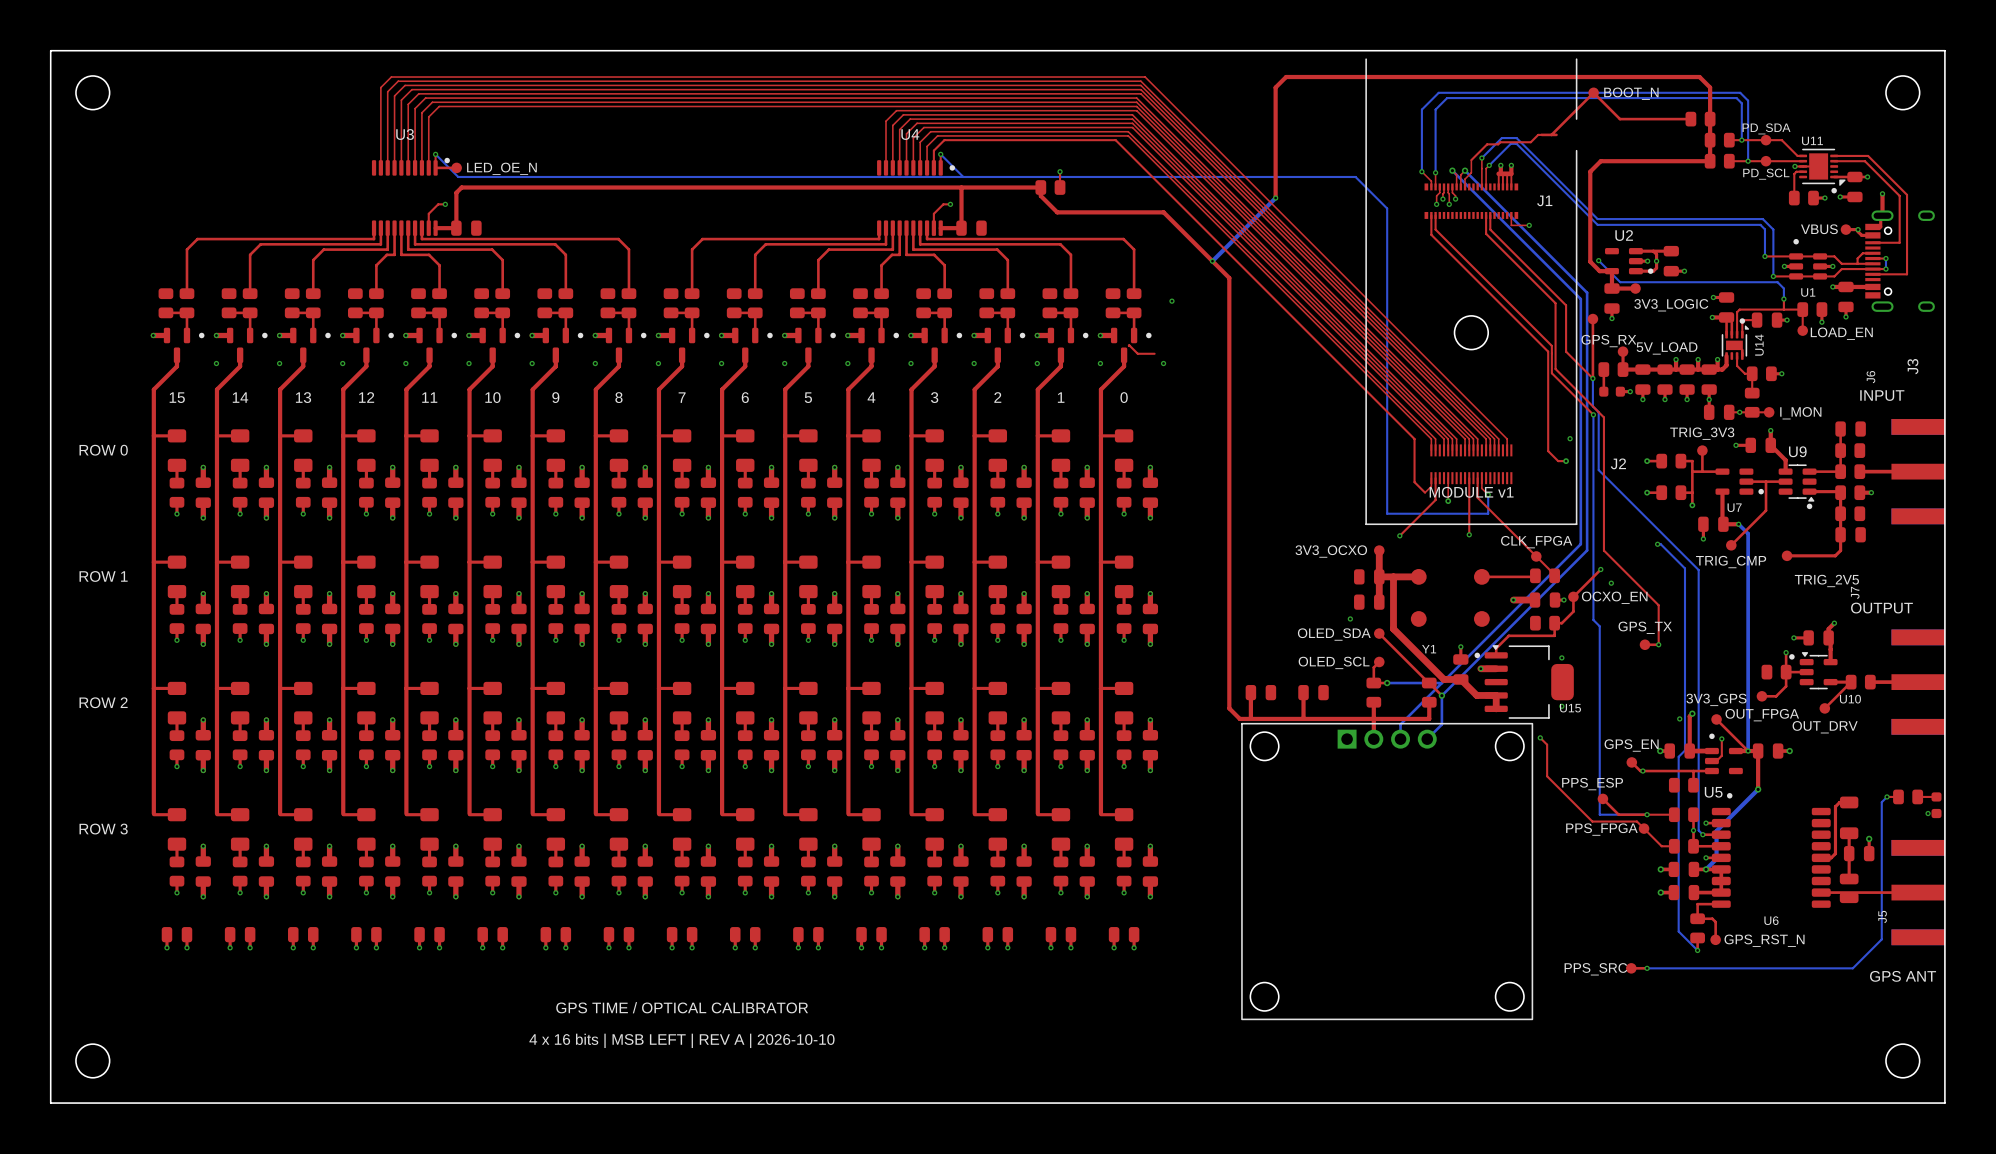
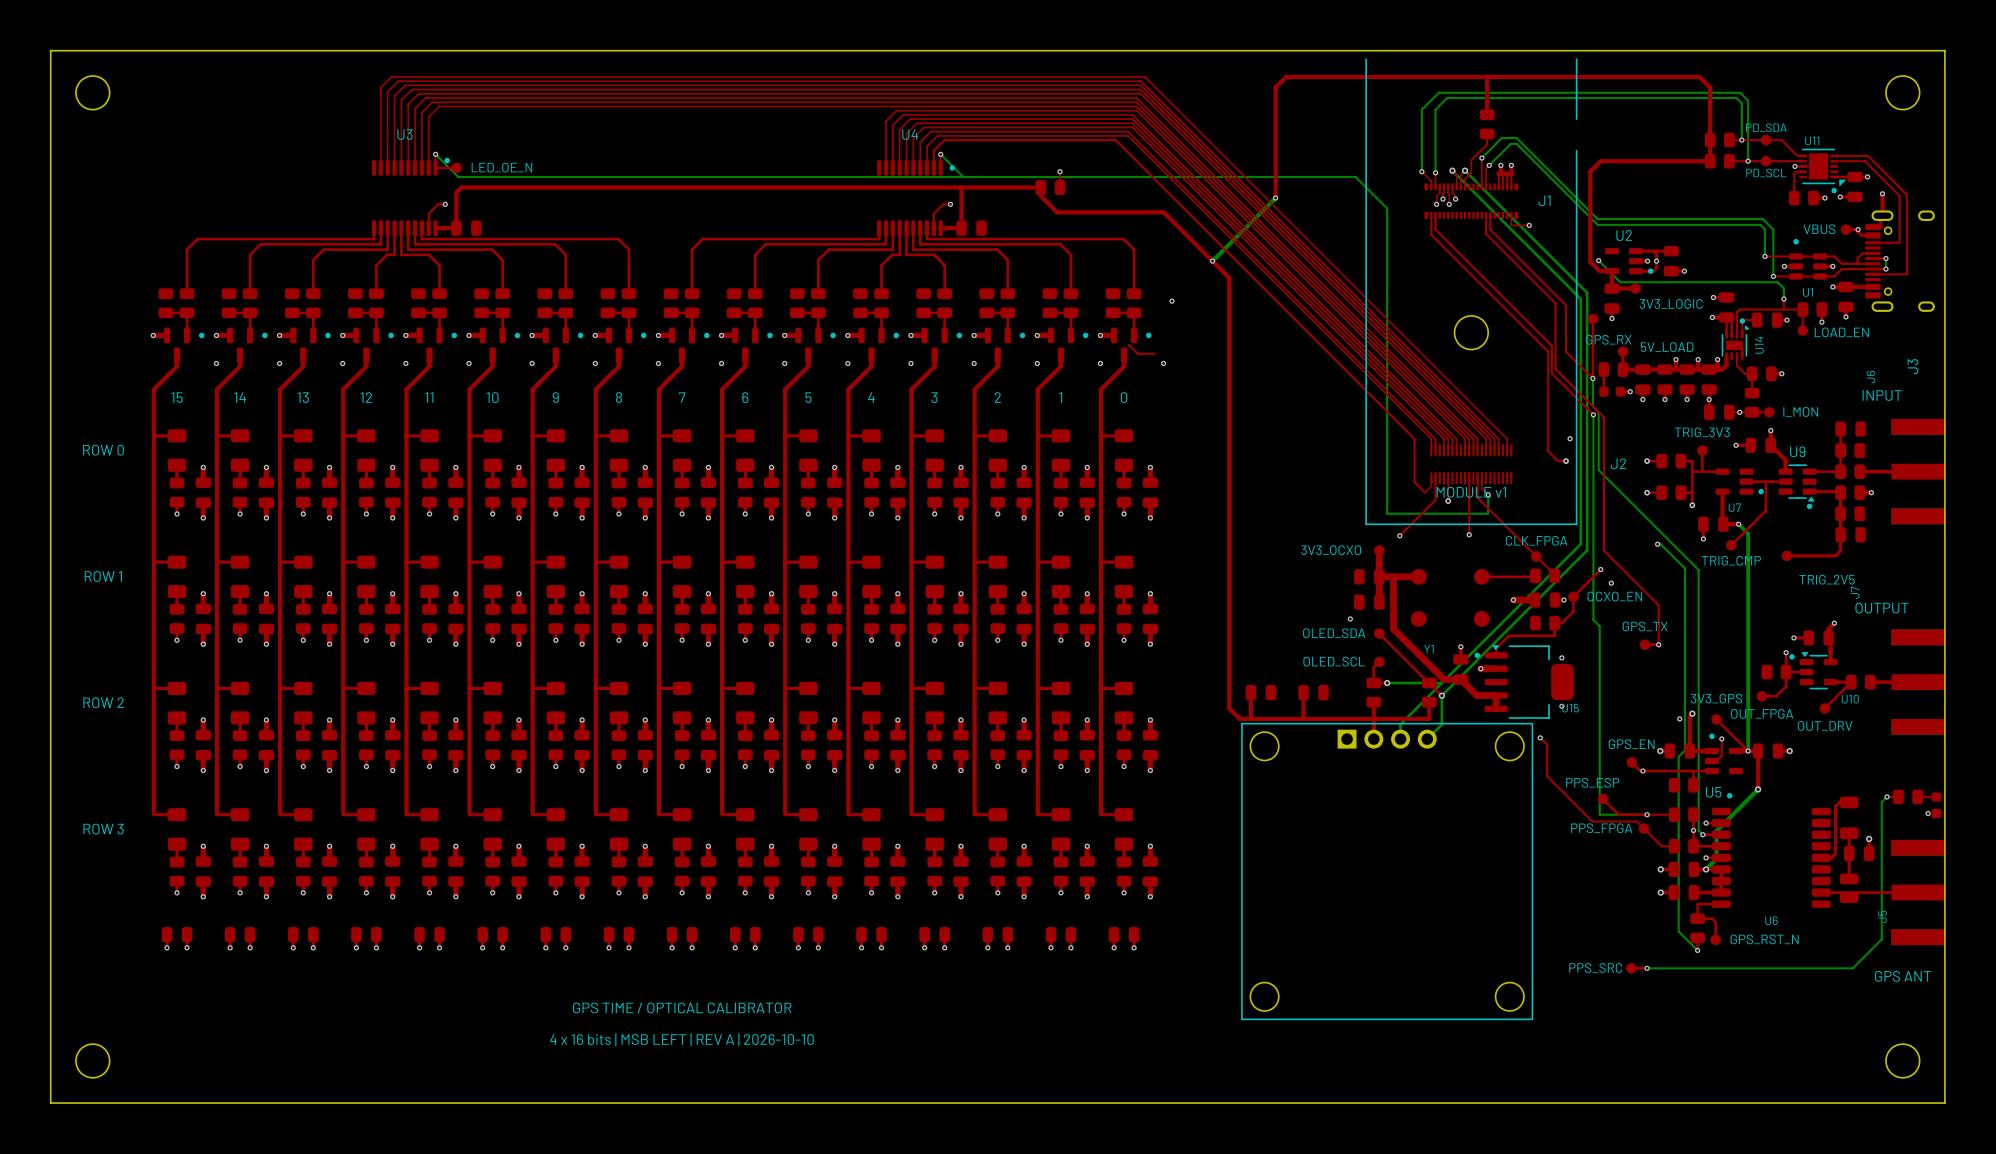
top track: none -> (1487, 77) (1487, 114)
part: BOOT_N (1593, 92) -> none
top track: (1690, 119) (1619, 119) (1593, 92) (1551, 134) -> none
part rotation: 0° (1700, 119) -> 90° clockwise (1487, 124)
part position: (1700, 119) -> (1487, 124)
top track: (1541, 134) (1538, 134) (1530, 142) (1487, 144) -> (1487, 133) (1487, 144)
top track: (1541, 134) (1556, 134) -> none

